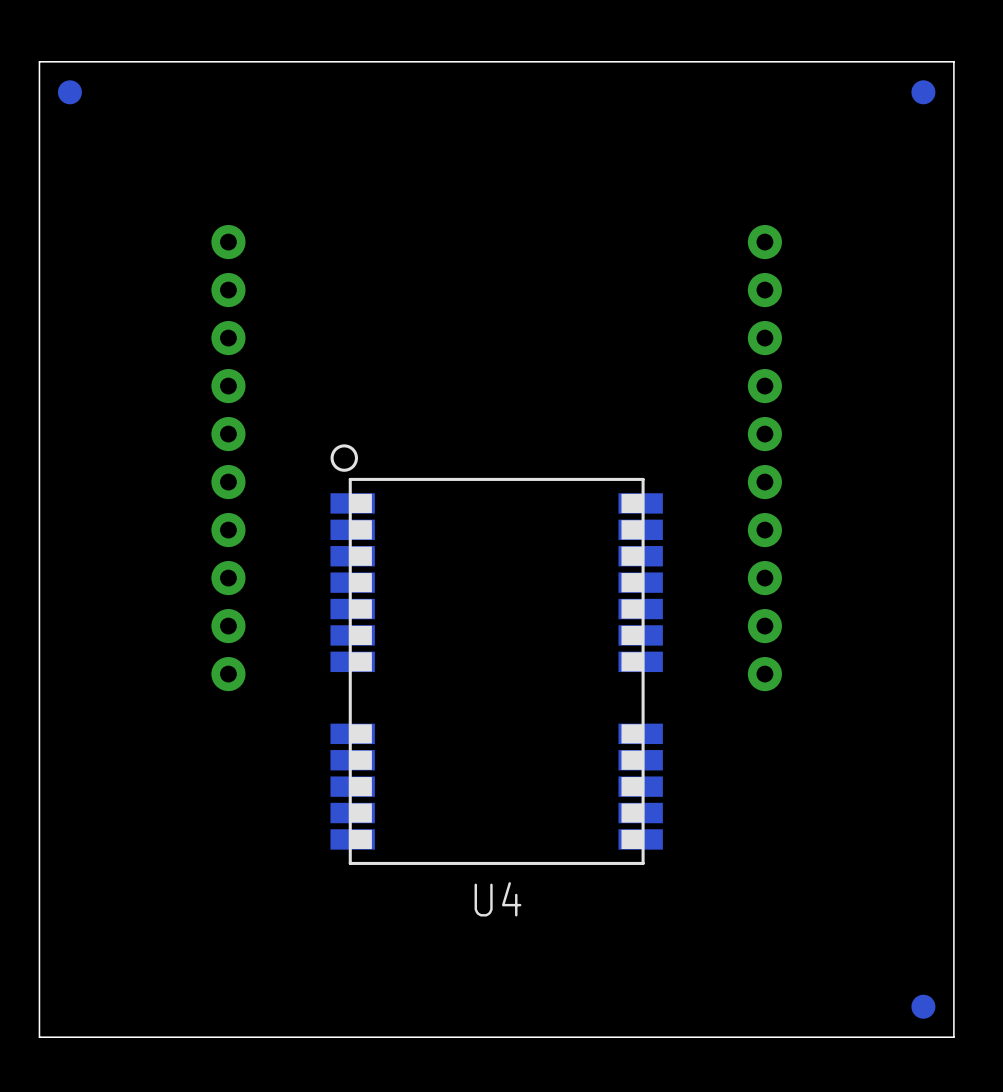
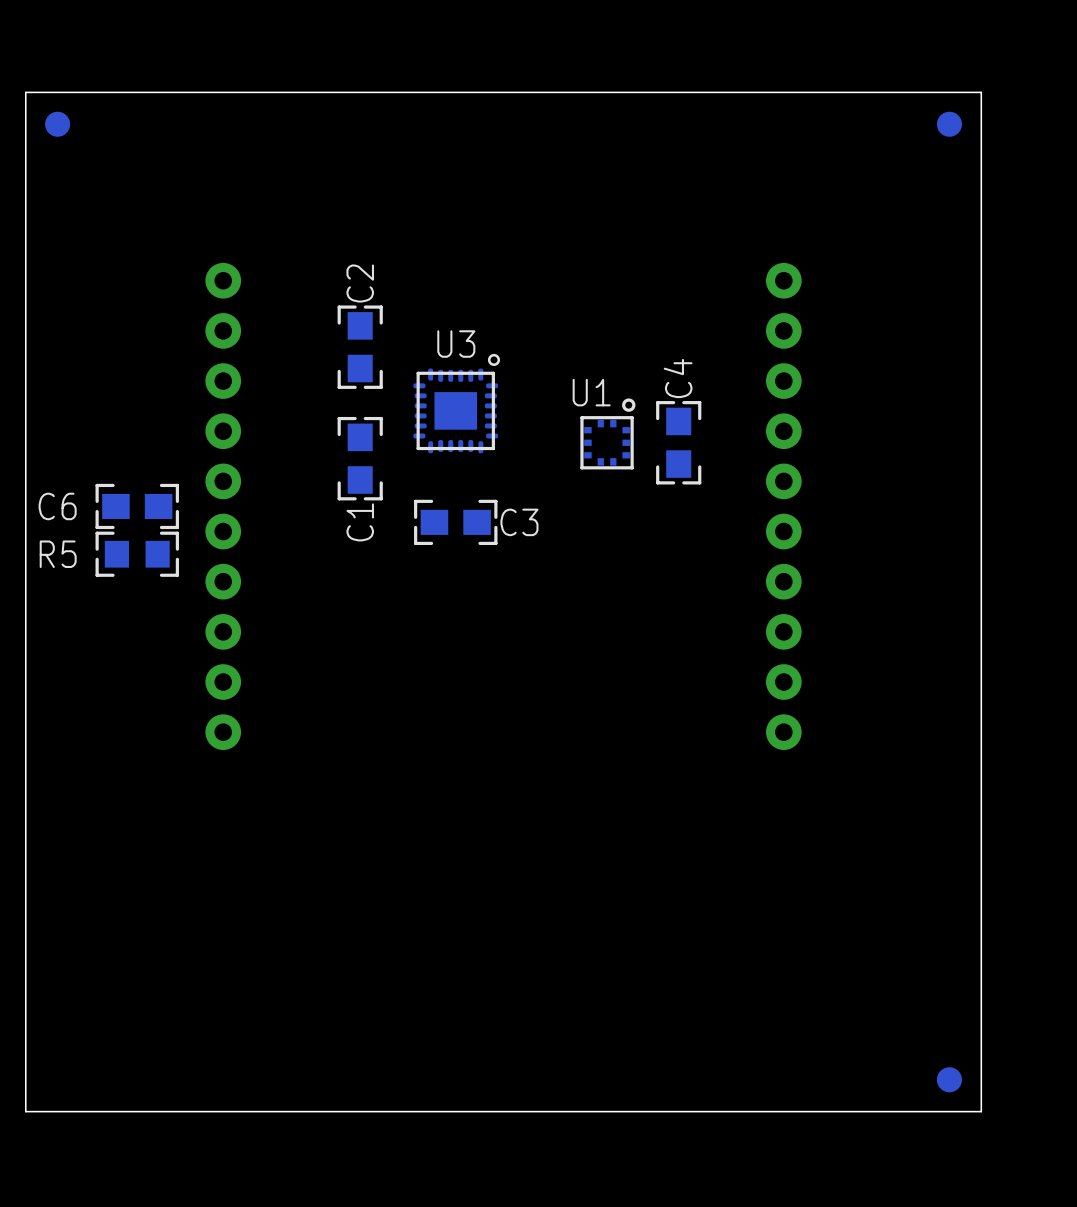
C2: none -> (360, 347)
U3: none -> (456, 403)
U1: none -> (607, 433)
C4: none -> (678, 442)
C1: none -> (360, 458)
C6: none -> (137, 506)
C3: none -> (455, 522)
R5: none -> (137, 554)
U4: (496, 654) -> none

